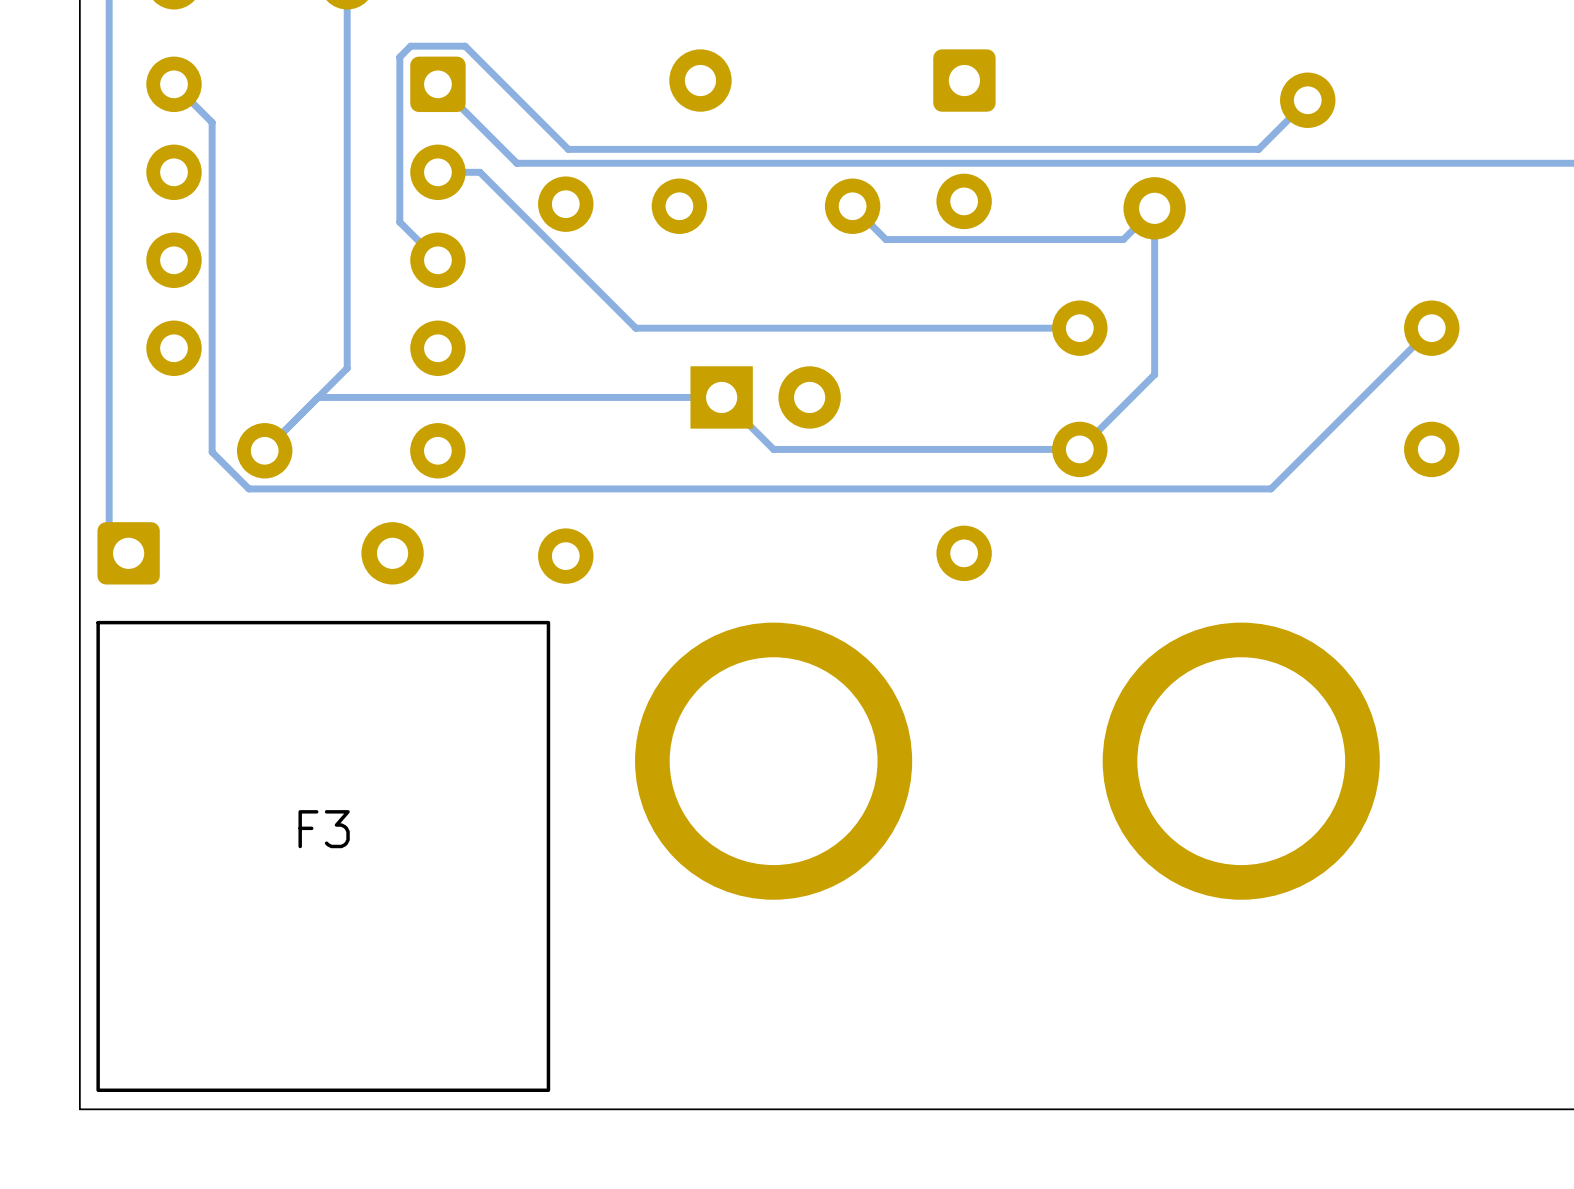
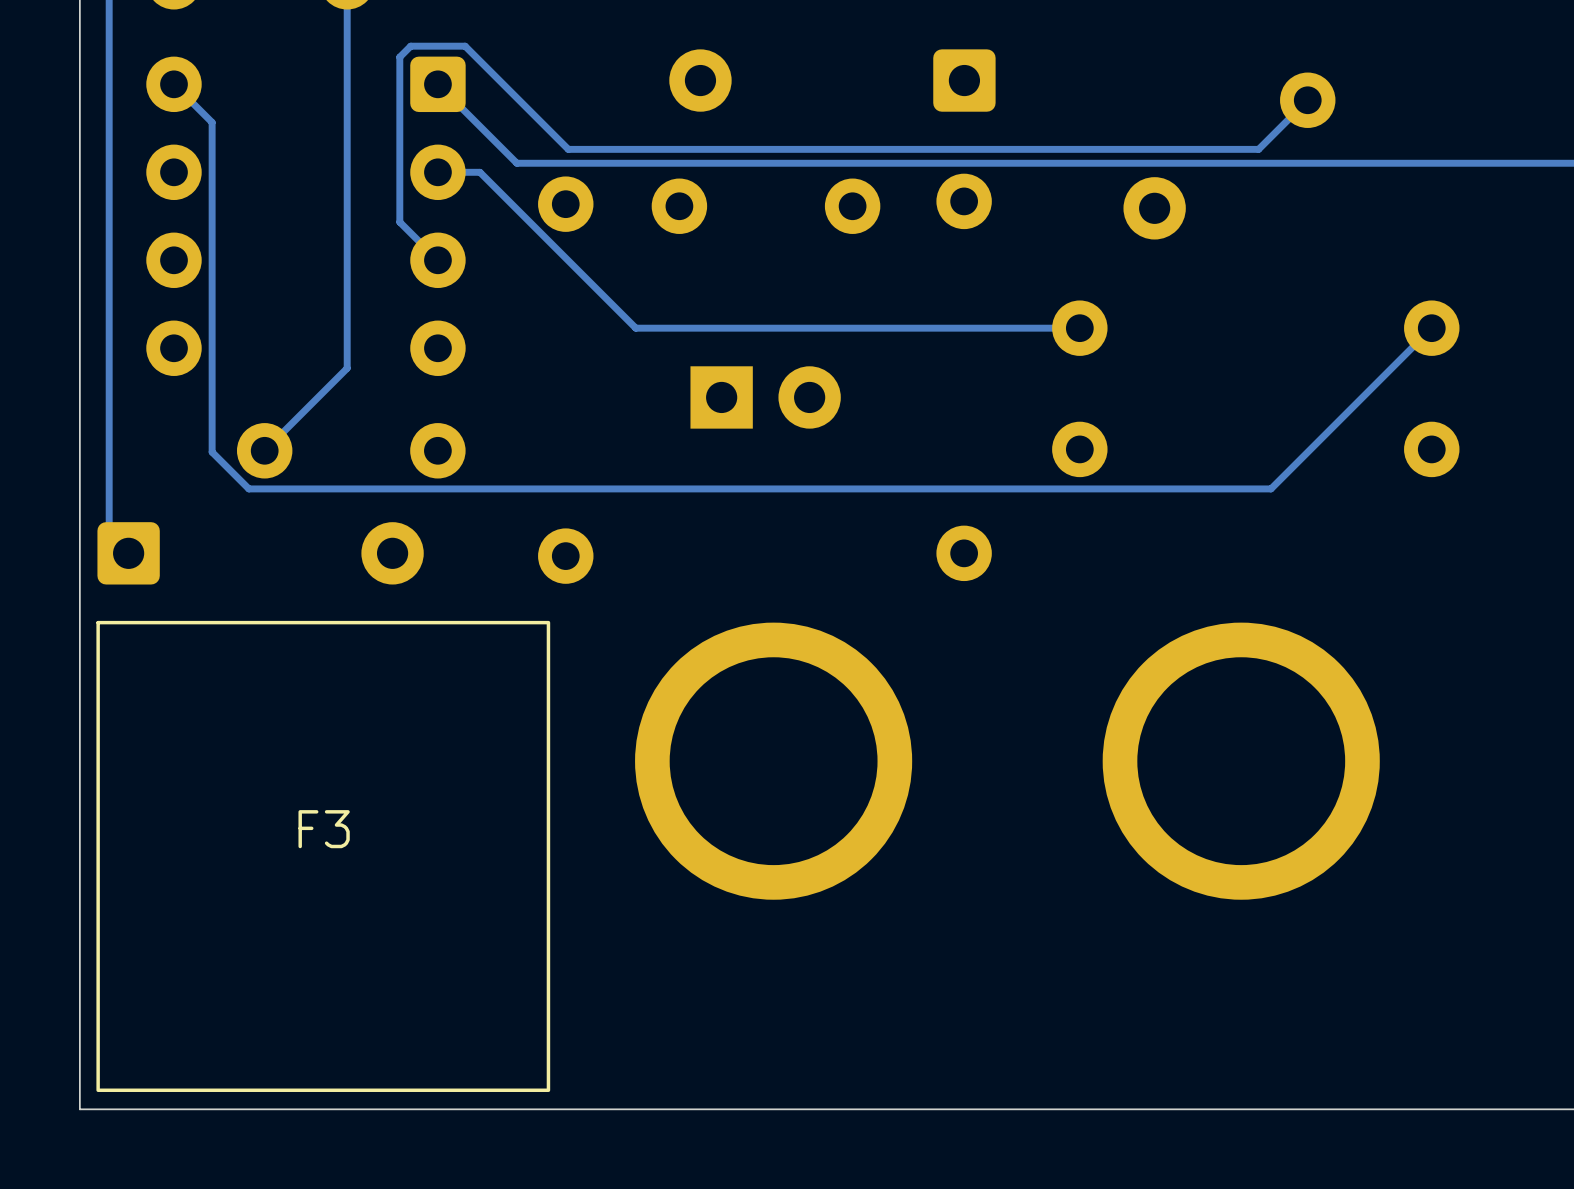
track: (852, 206) (885, 239) (1123, 239) (1154, 208) (1154, 374) (1079, 449) (773, 449) (721, 397) (318, 397) -> none

